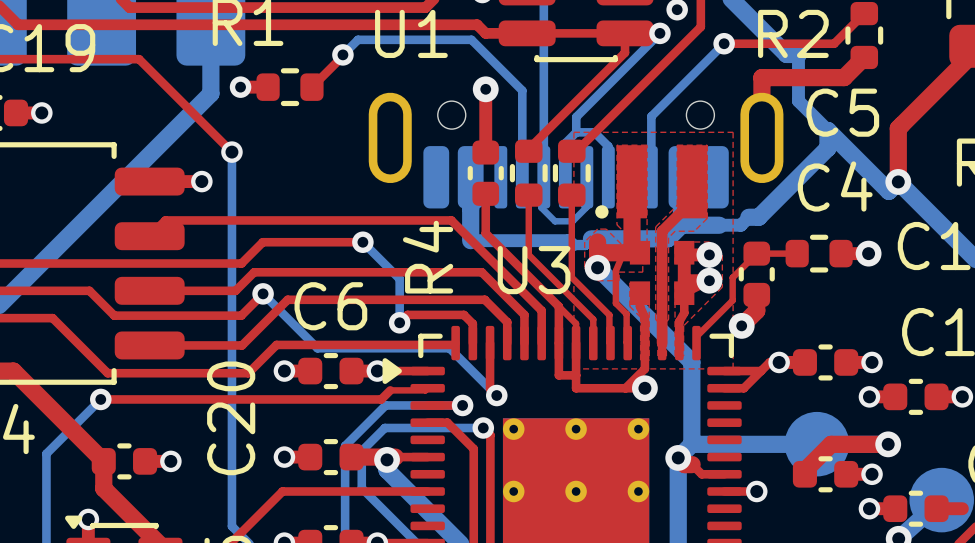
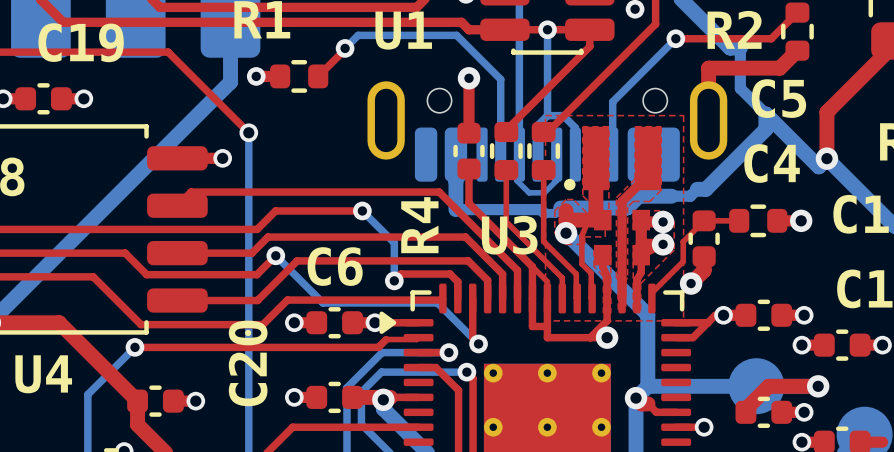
via: none -> (547, 29)
bottom track: (659, 33) (576, 117) -> (547, 29) (547, 102)
via: (659, 33) -> none

